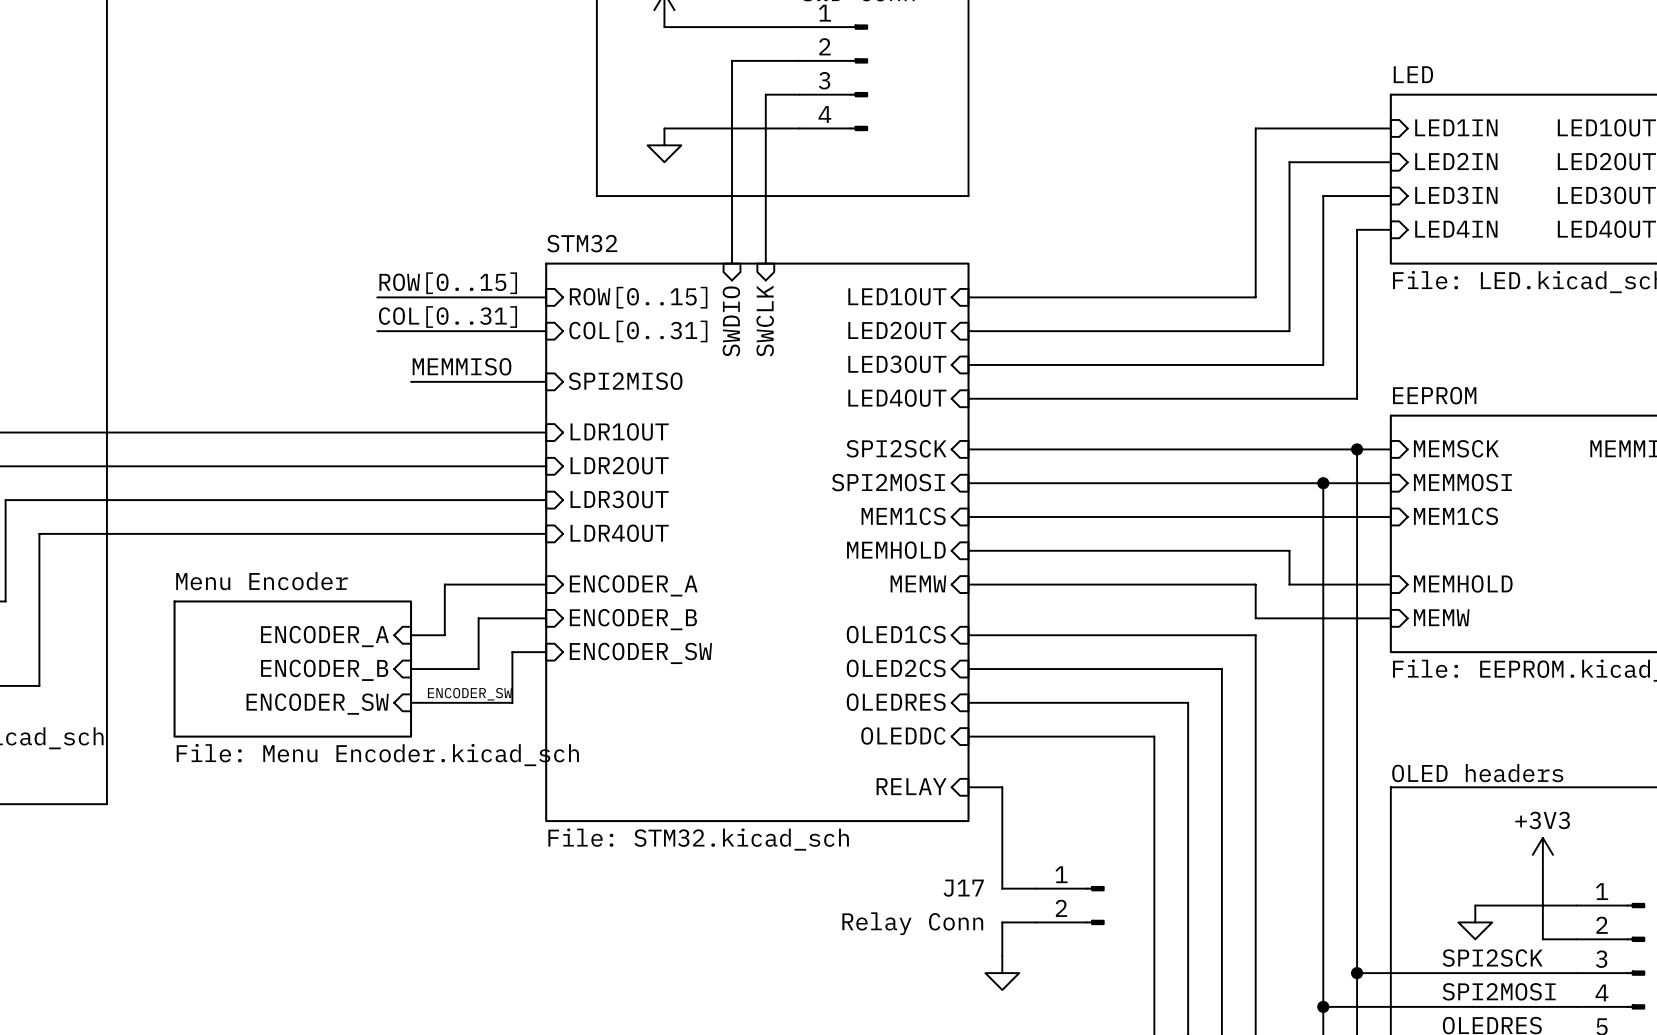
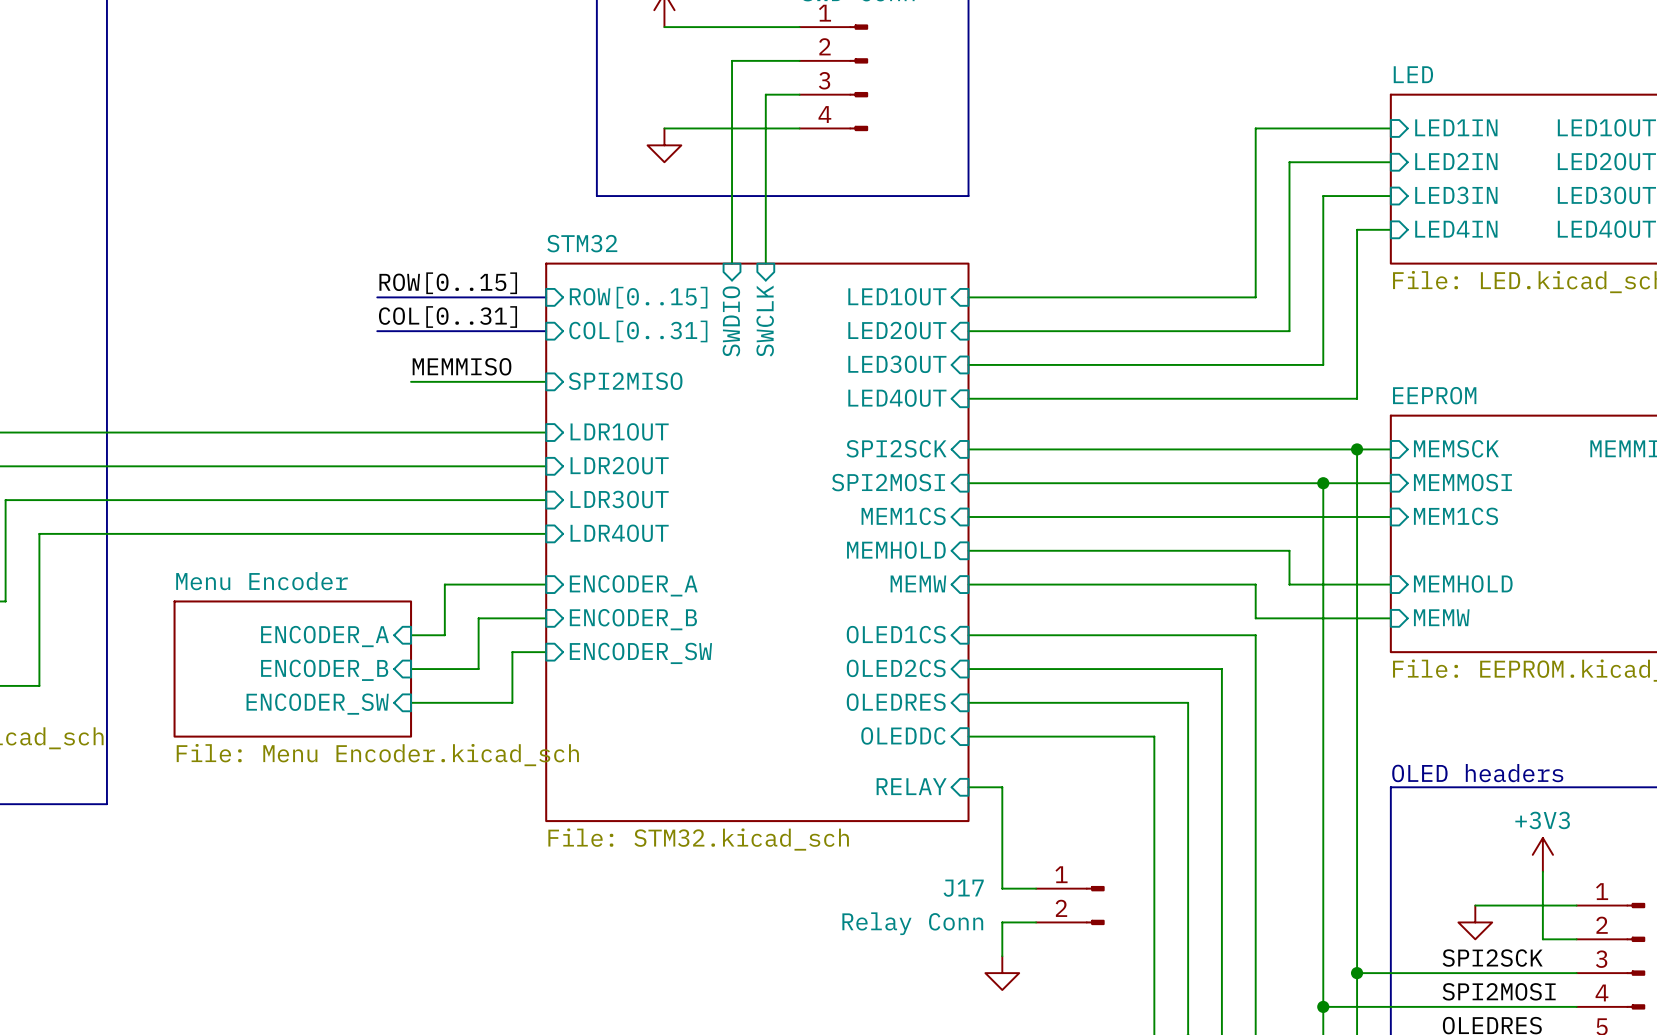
label: ENCODER_SW (469, 694) -> none

